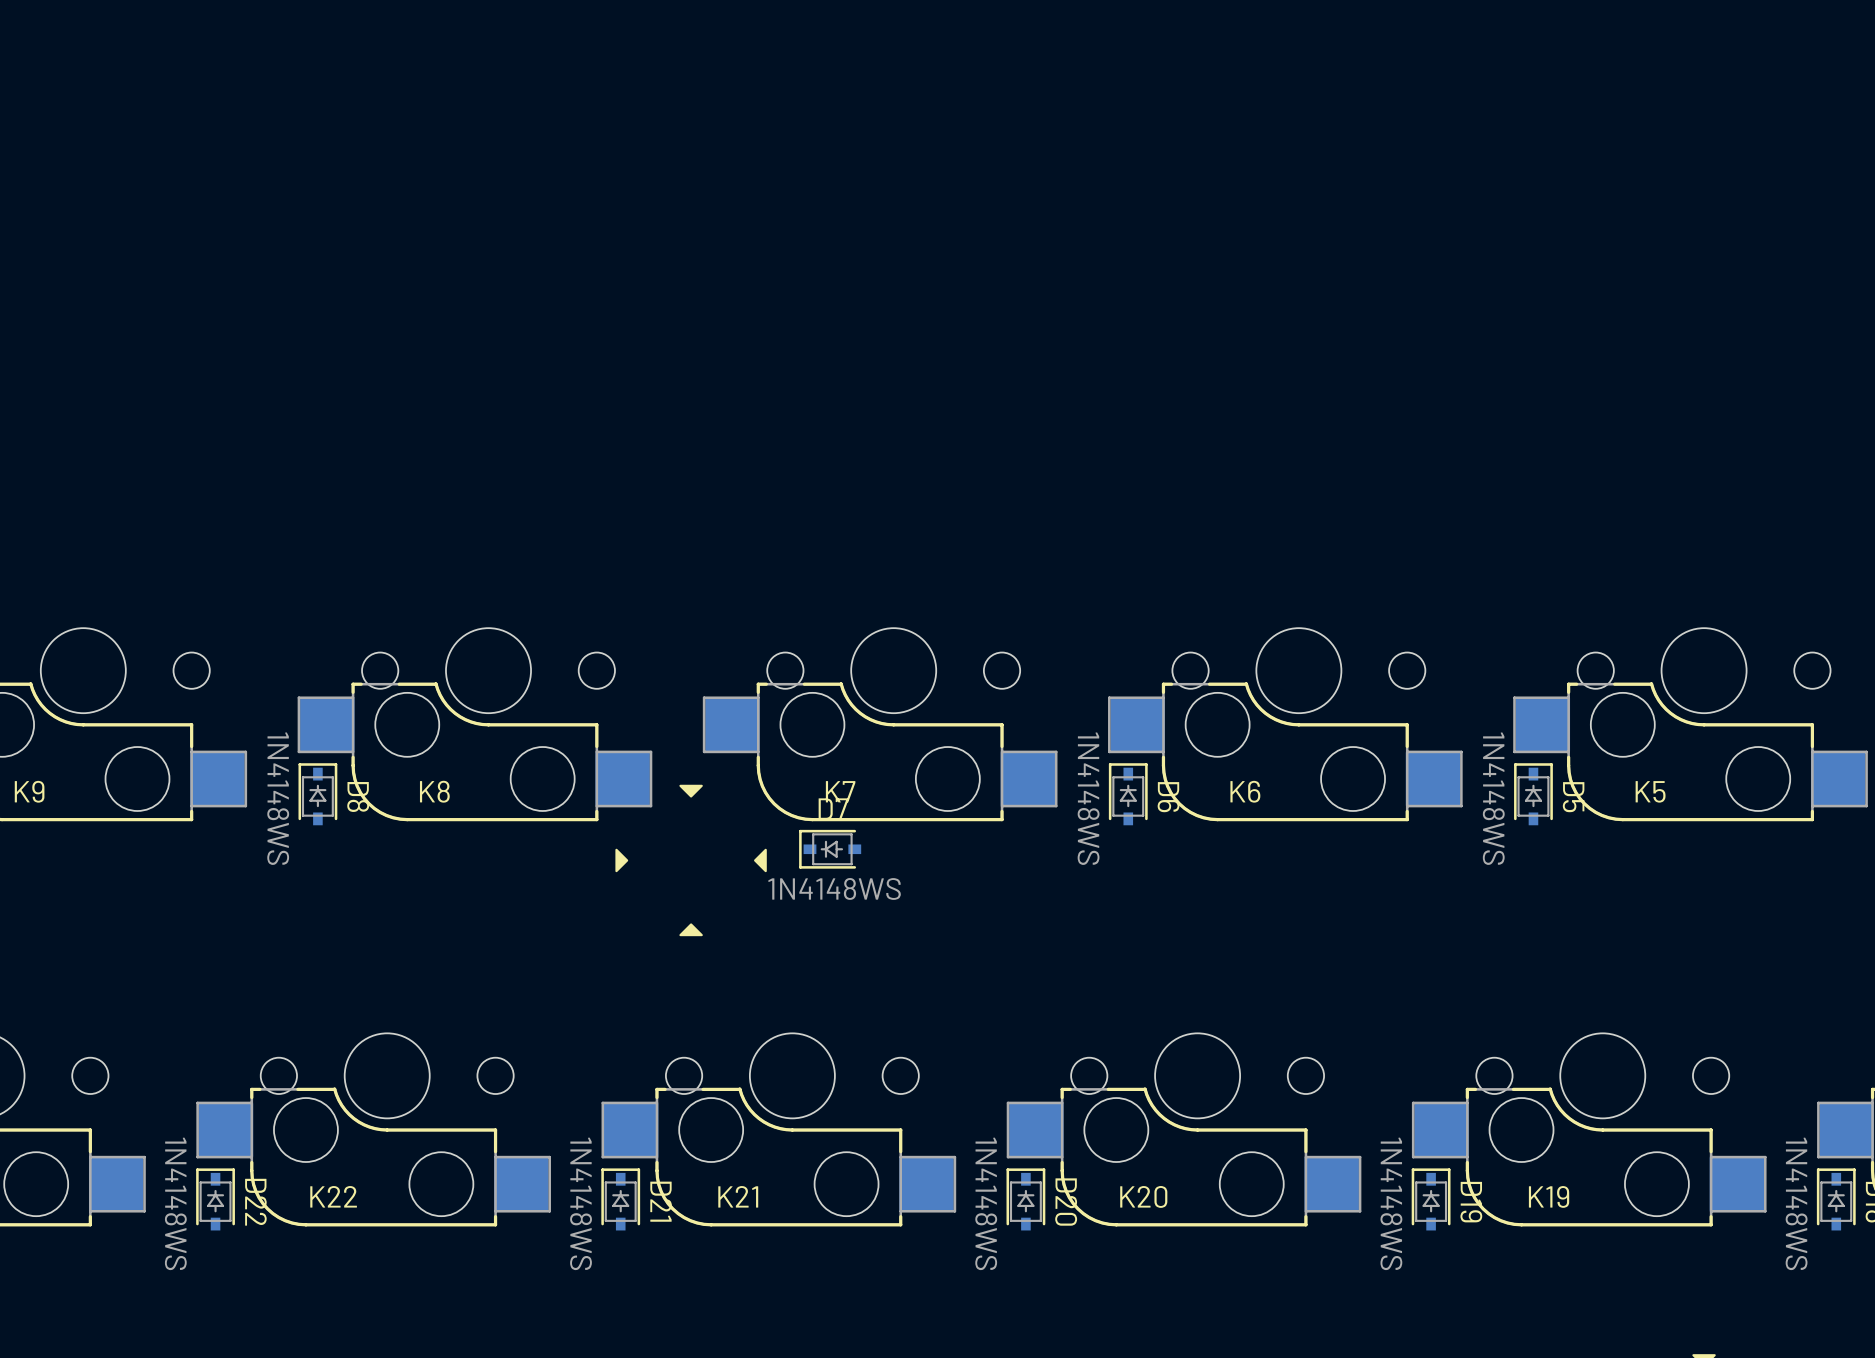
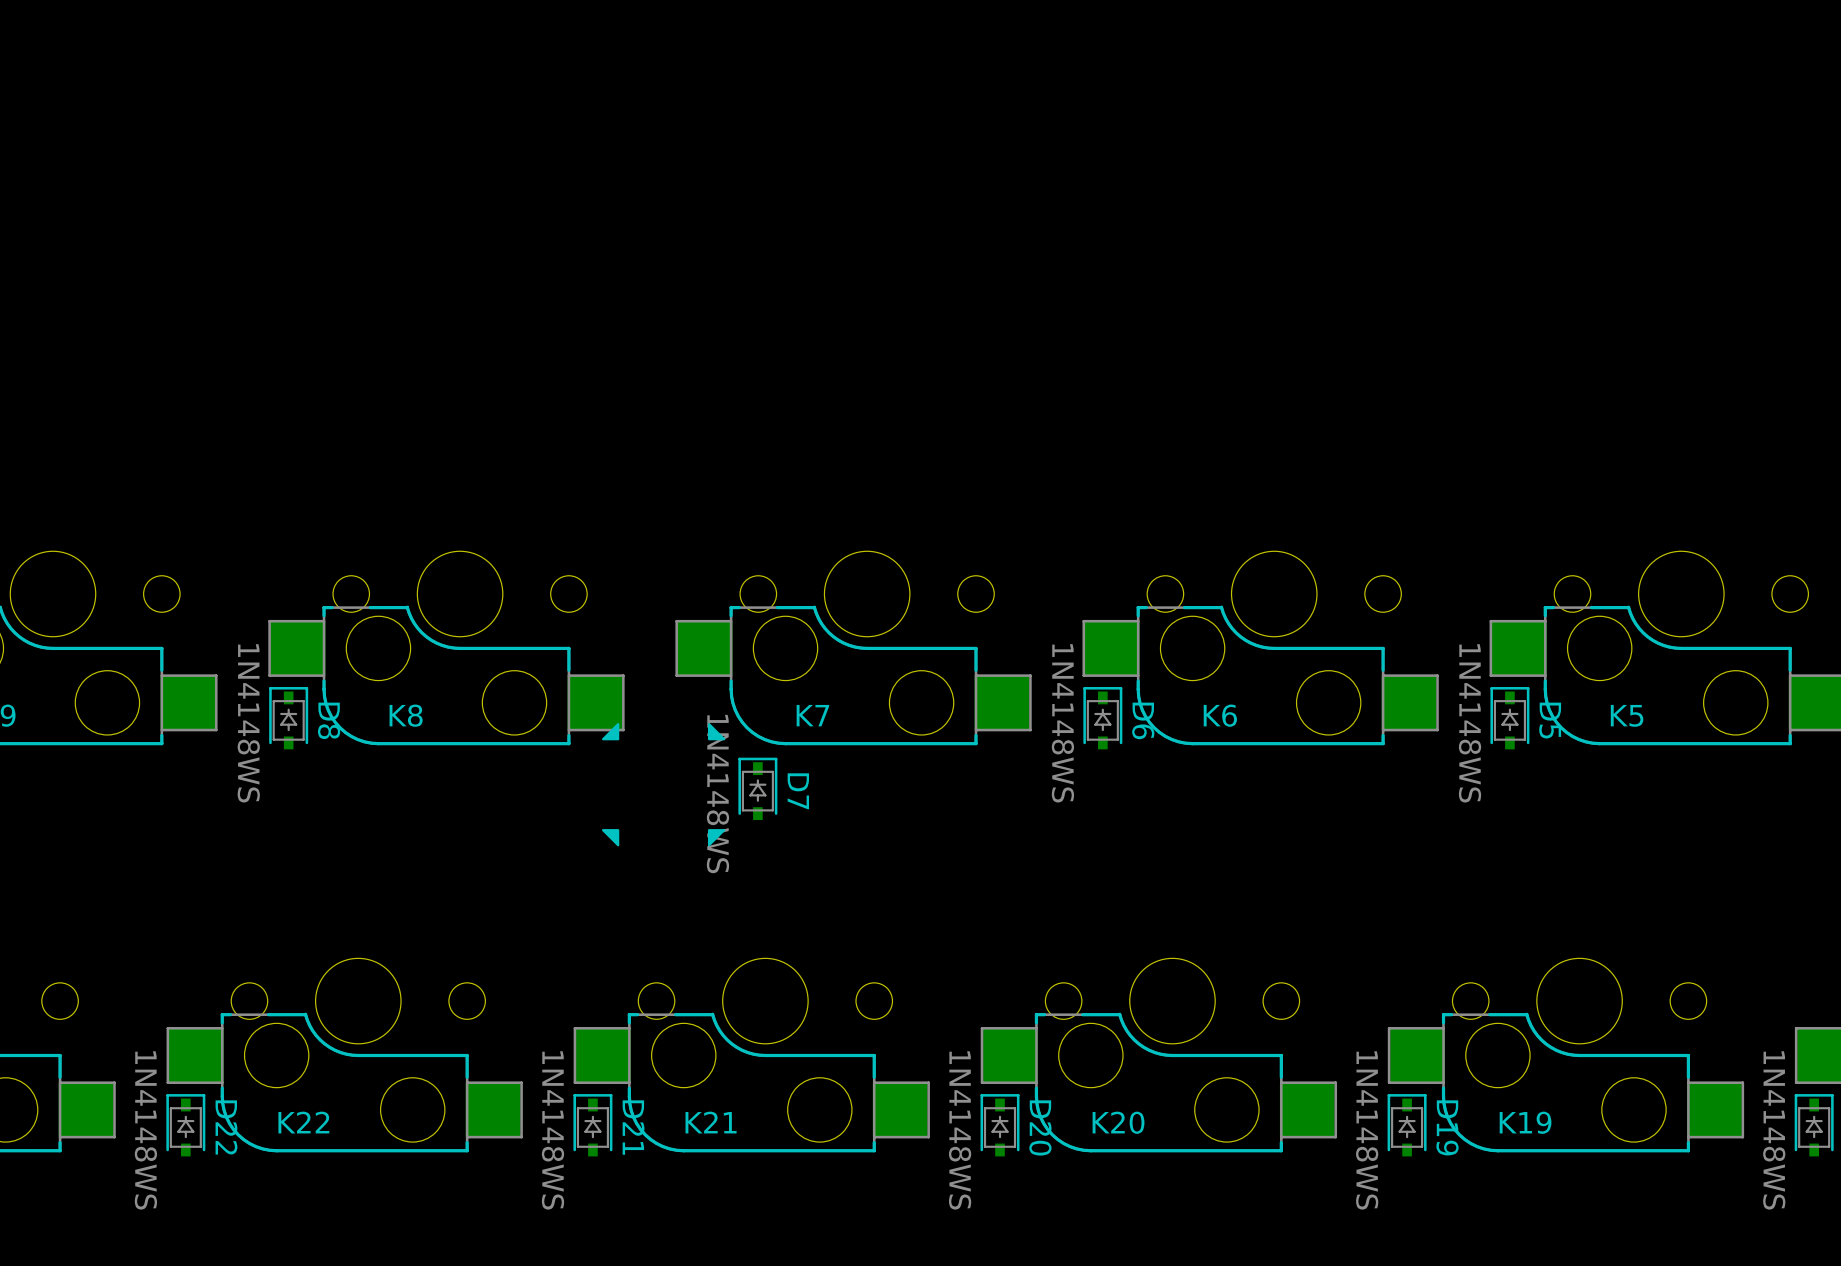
drawing shape: [615, 784, 767, 937] -> [601, 723, 726, 847]
D7 rotation: 0° (830, 849) -> 90° clockwise (757, 788)
D7 position: (830, 849) -> (757, 788)

